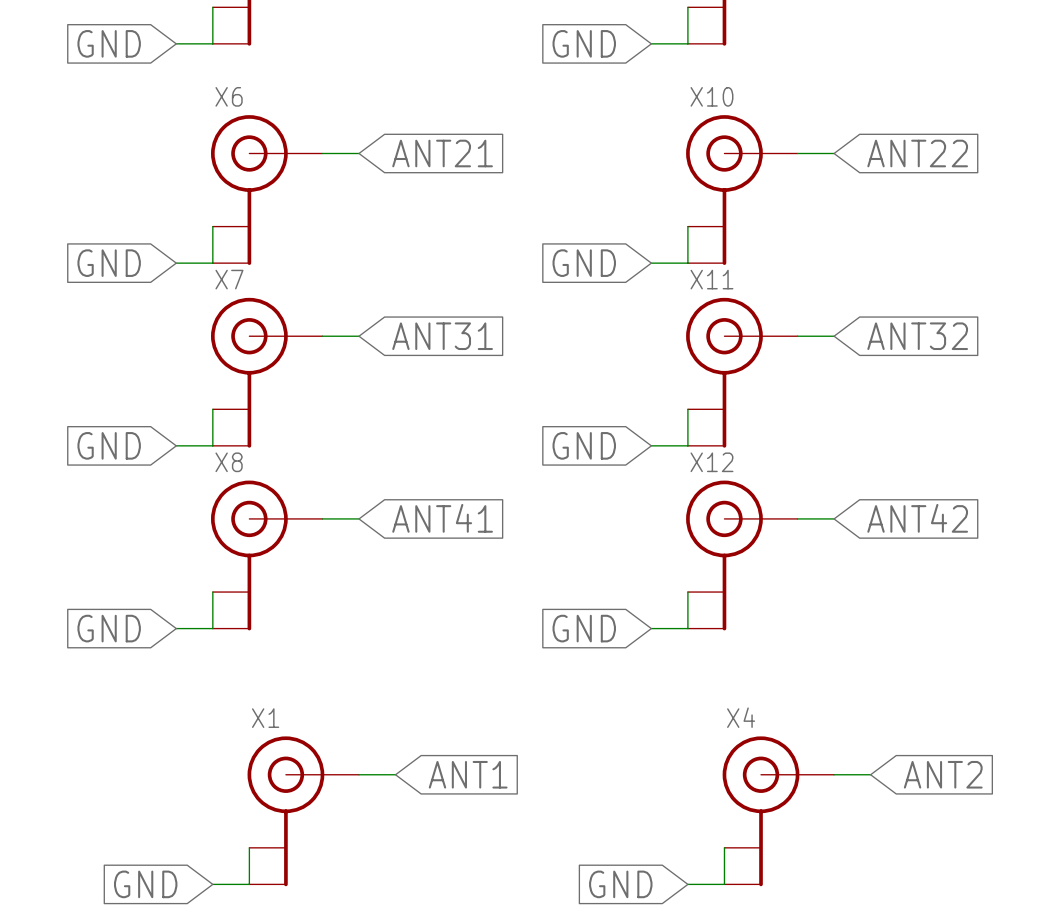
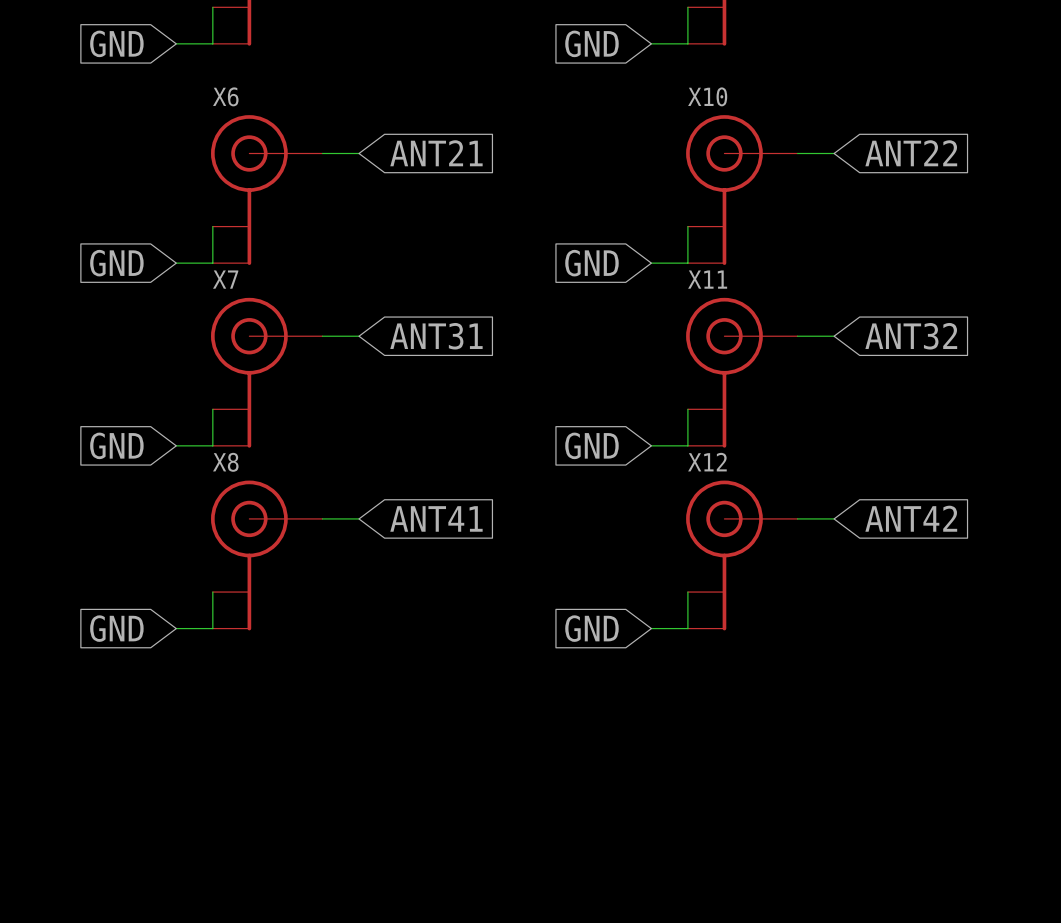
wire: (359, 774) (395, 774) -> none
global label: ANT1 (468, 774) -> none
wire: (834, 774) (870, 774) -> none
global label: ANT2 (943, 774) -> none
X1: (303, 811) -> none
X4: (778, 811) -> none
wire: (249, 847) (249, 884) (212, 884) -> none
wire: (724, 847) (724, 884) (687, 884) -> none
global label: GND (145, 884) -> none
global label: GND (620, 884) -> none

